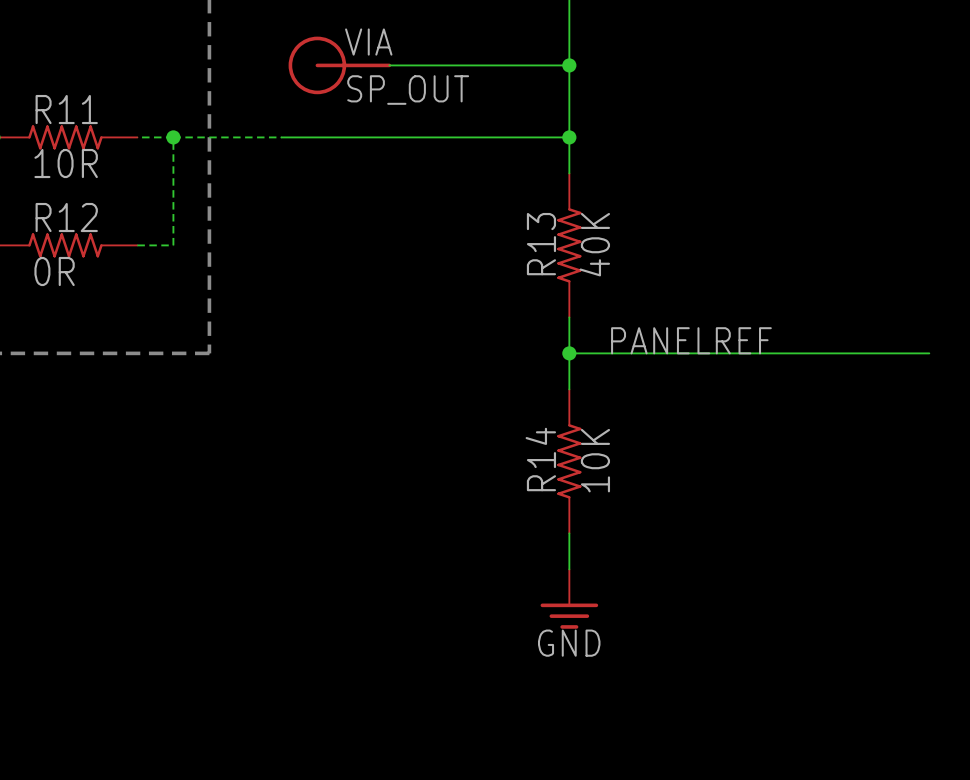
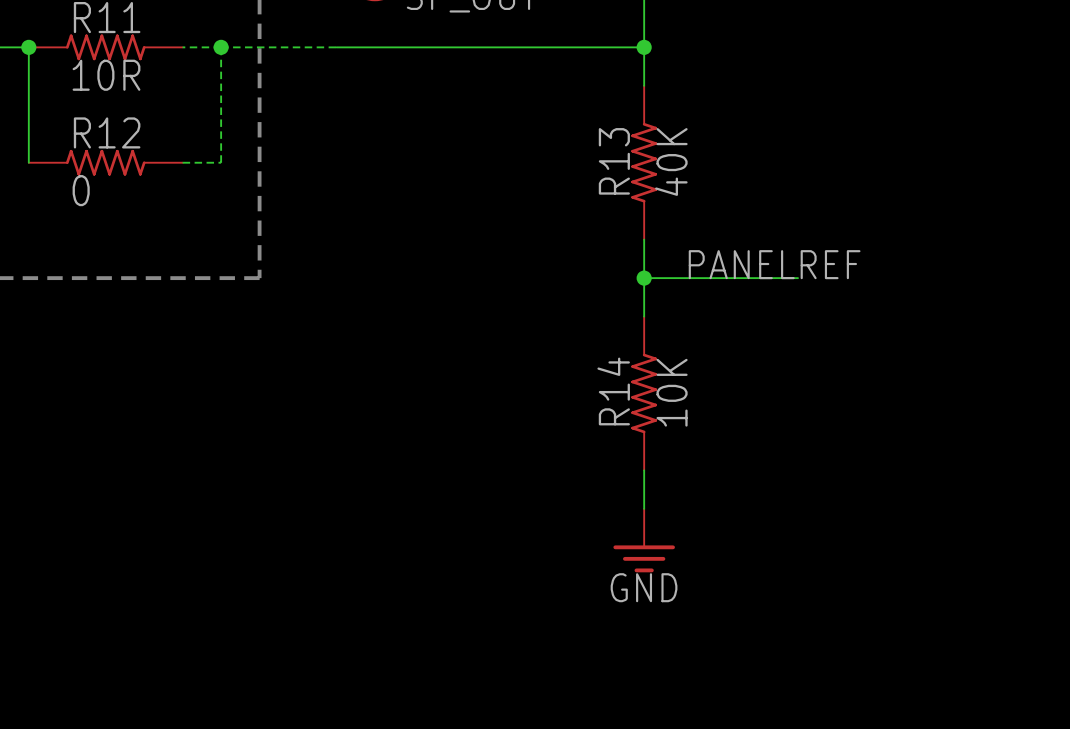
R12 value: 0R (54, 271) -> 0 (81, 190)
wire: (713, 353) (929, 353) -> none

